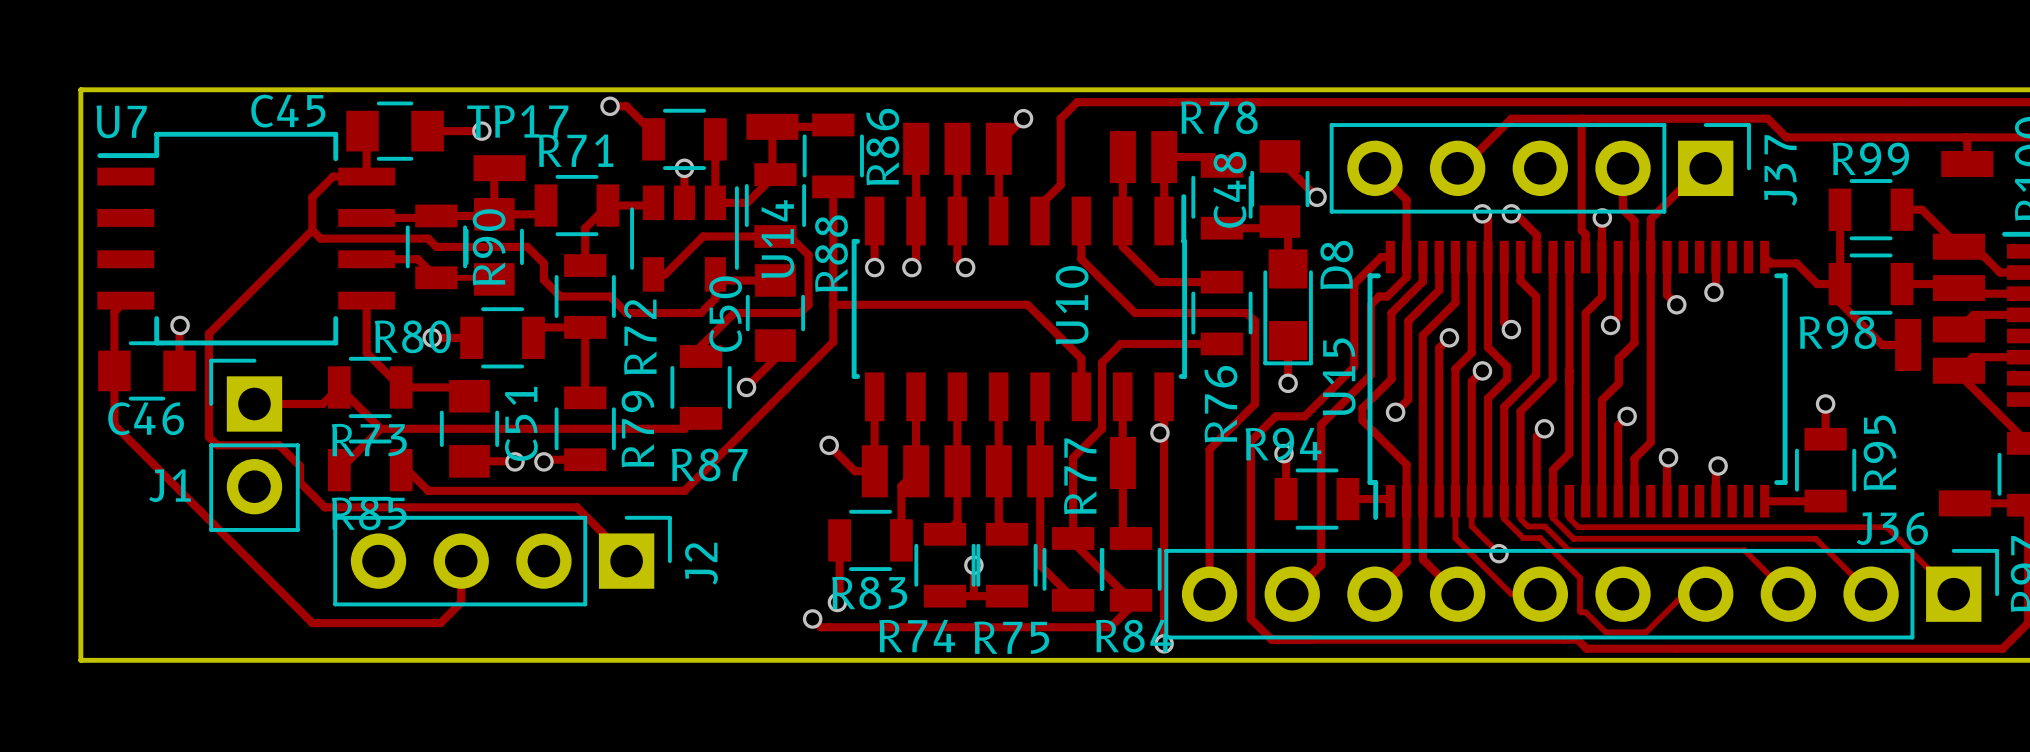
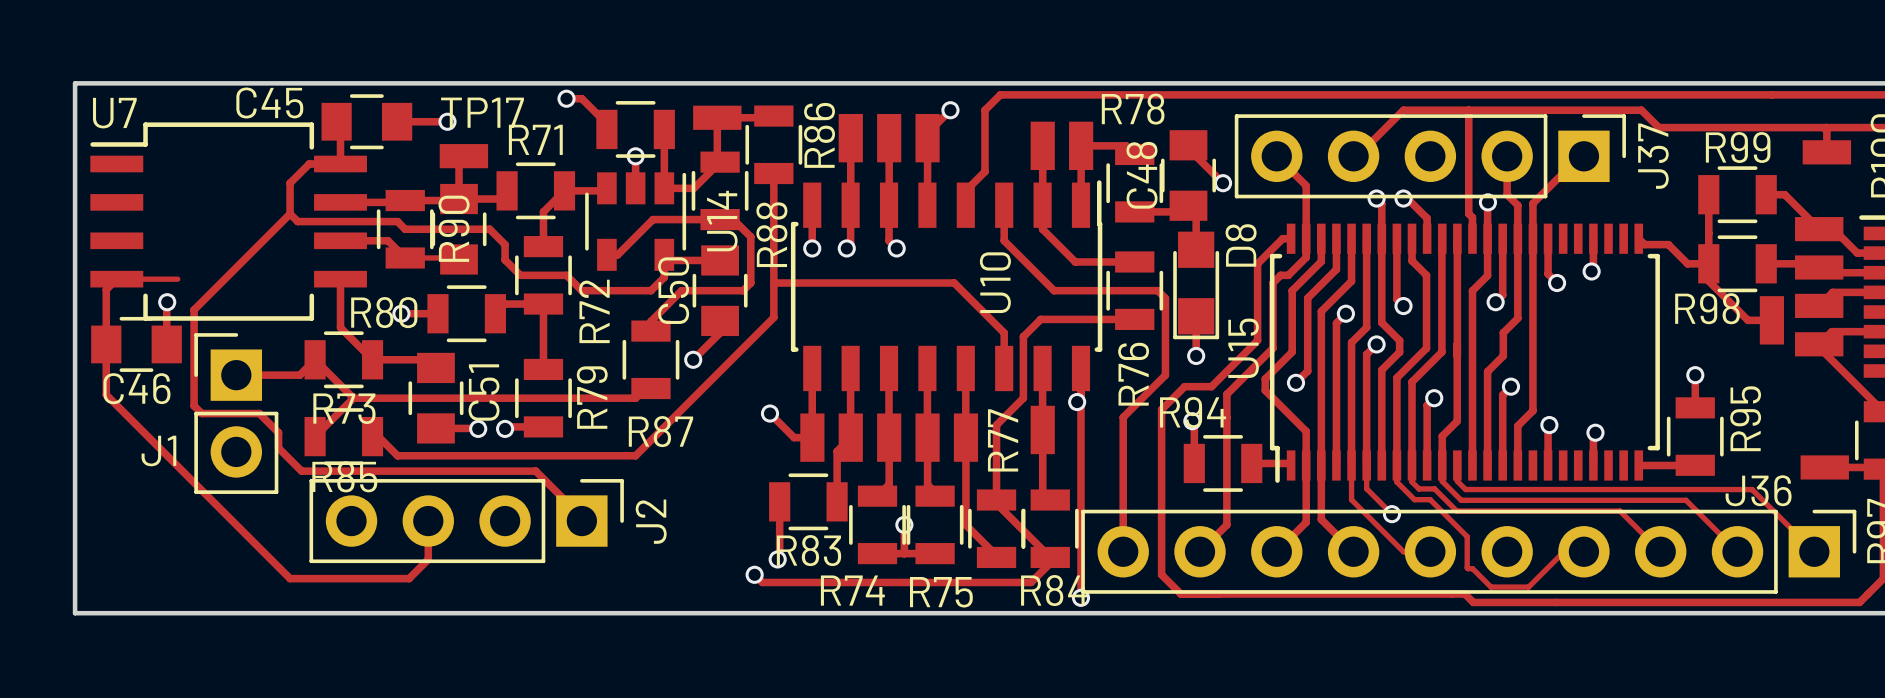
track: none -> (177, 279) (116, 279) (106, 289)

